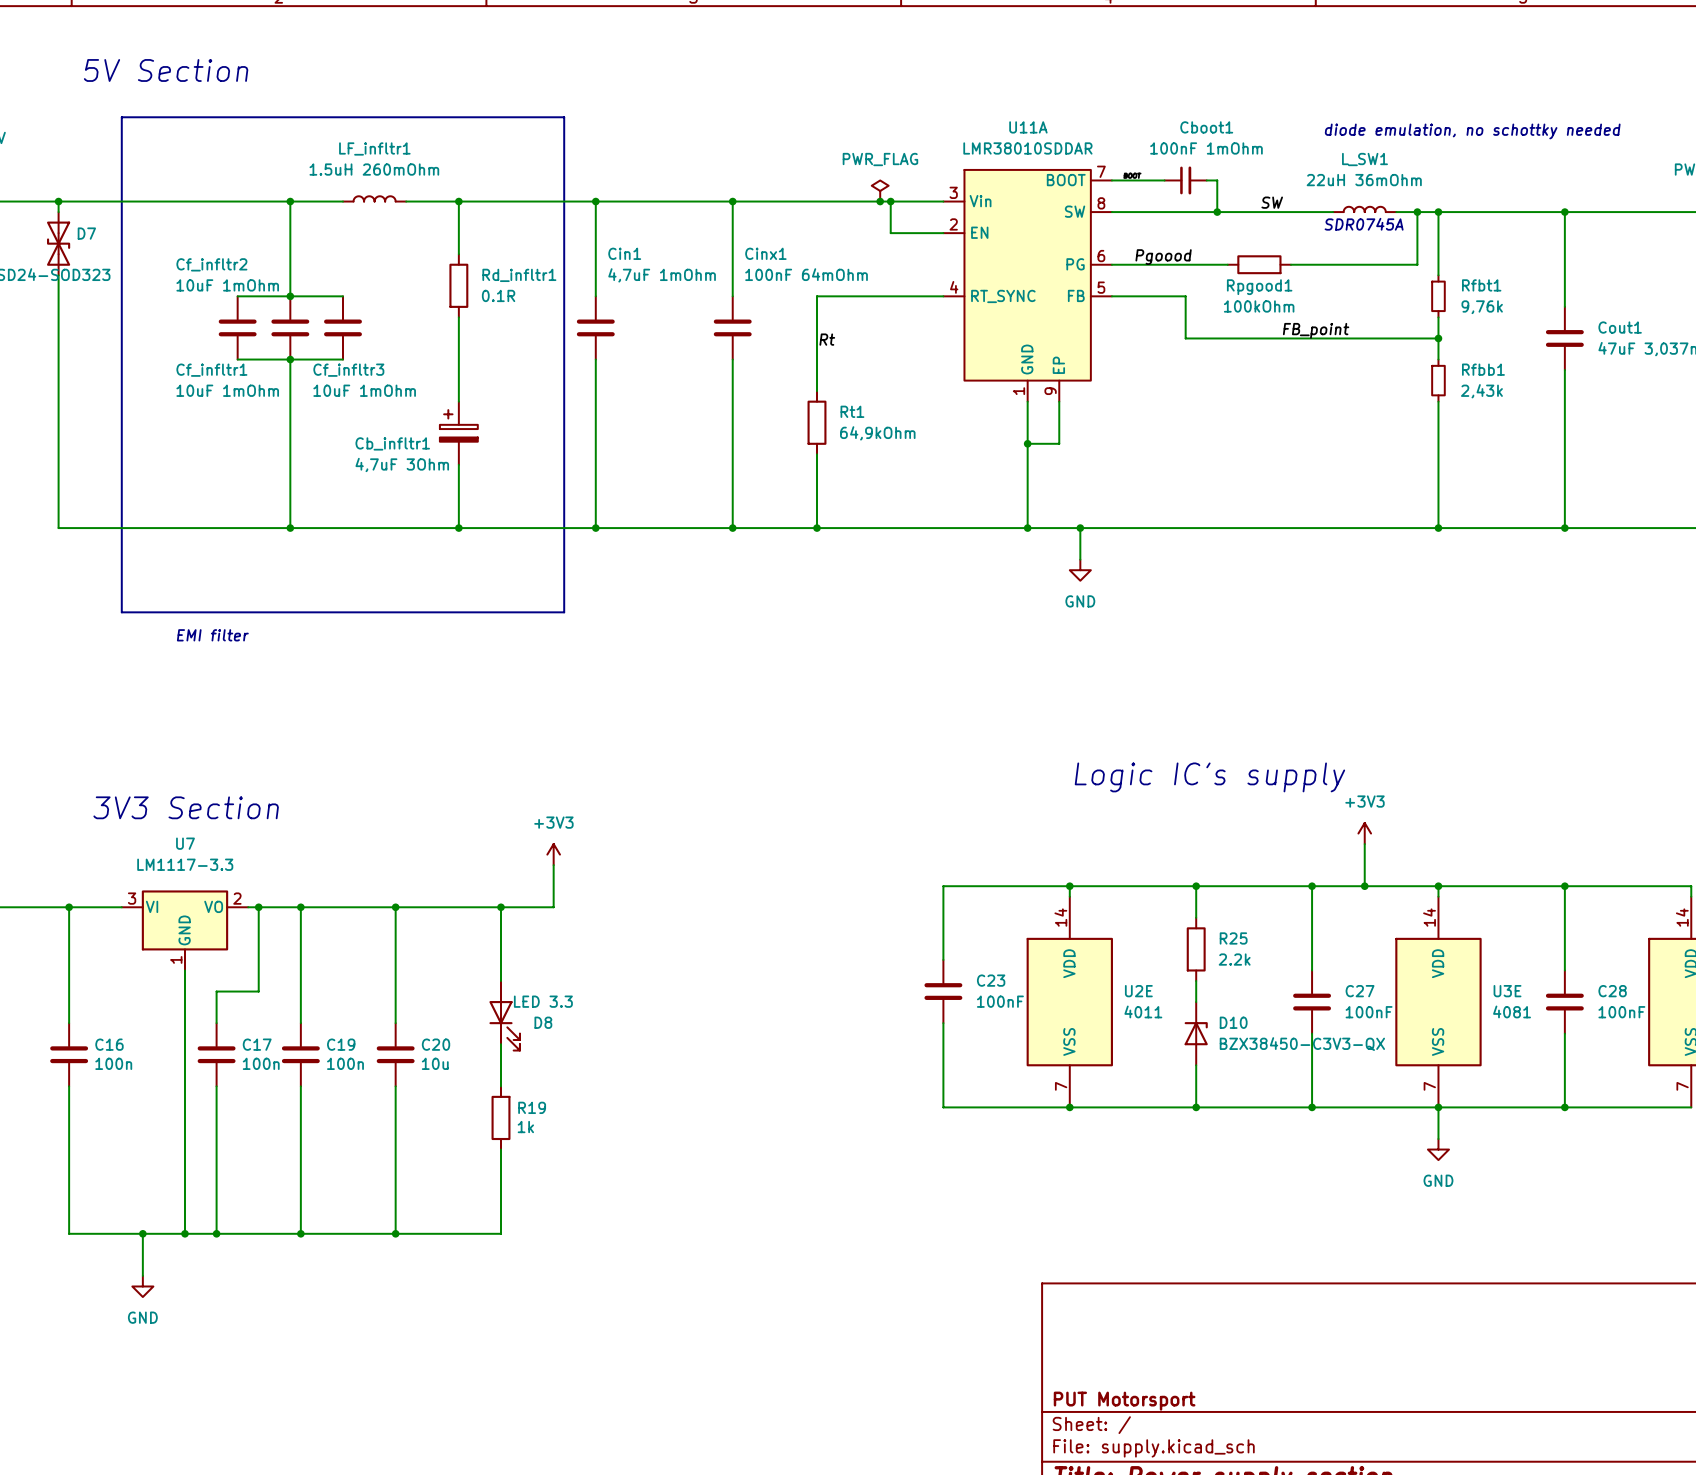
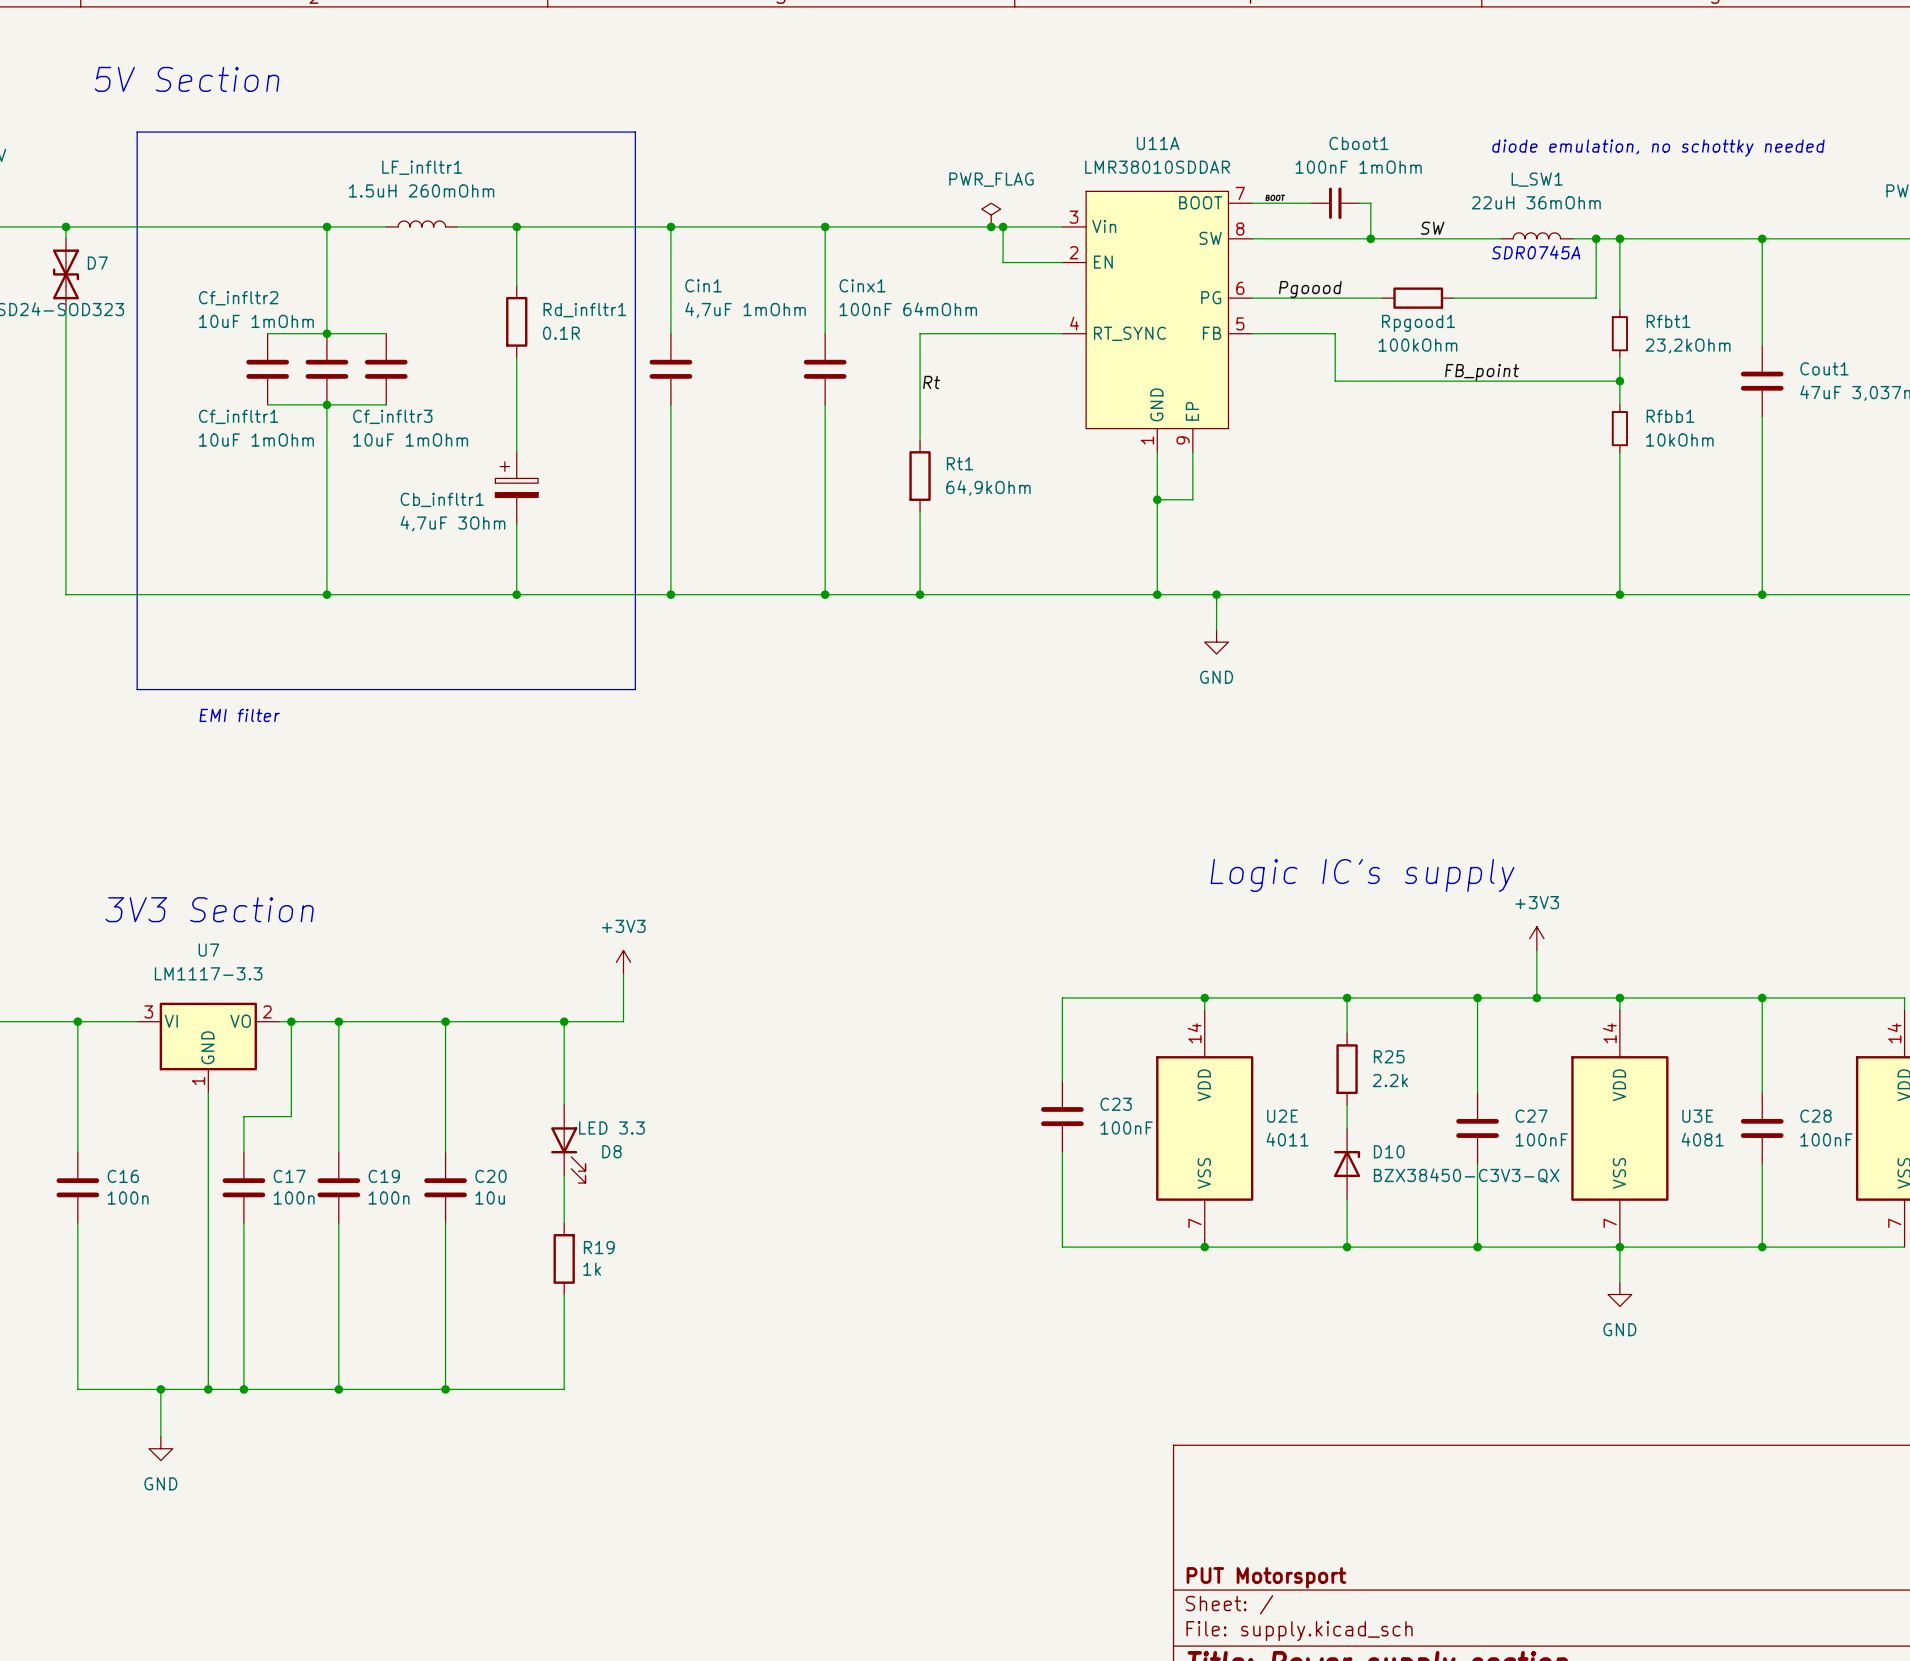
Rfbt1 value: 9,76k (1482, 307) -> 23,2kOhm (1688, 345)
Rfbb1 value: 2,43k (1481, 391) -> 10kOhm (1679, 440)

